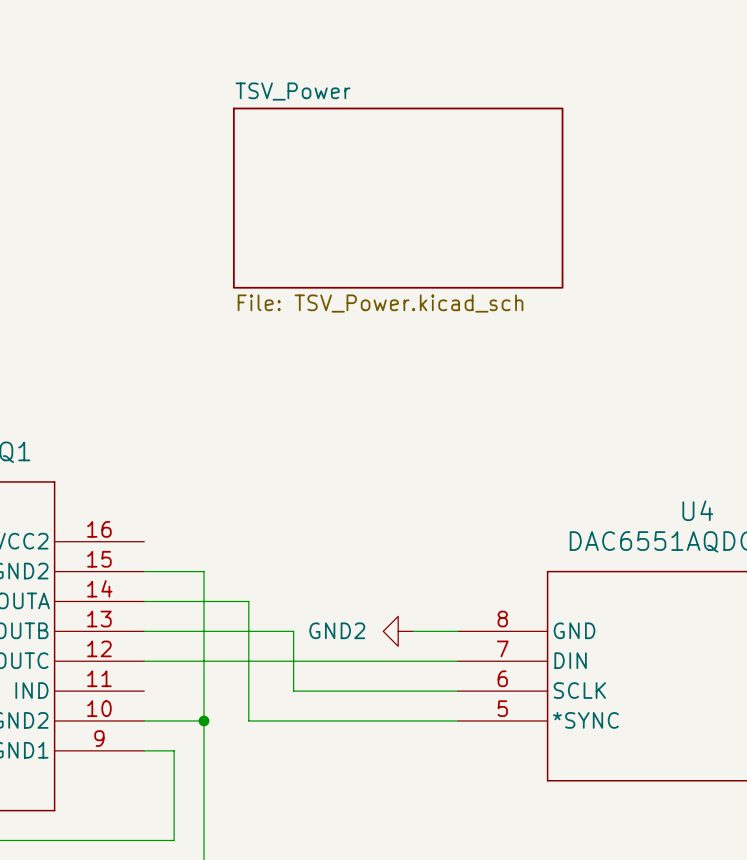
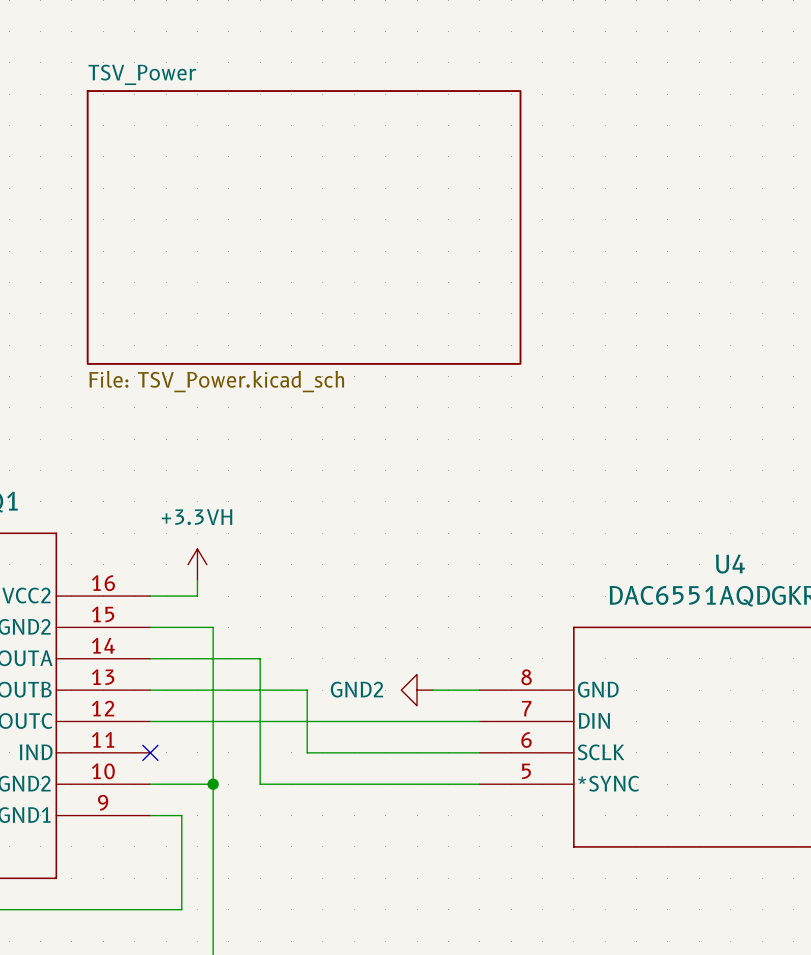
sheet TSV_Power: none -> File: TSV_Power.kicad_sch (304, 227)
sheet TSV_Power: File: TSV_Power.kicad_sch (398, 198) -> none
power symbol: none -> +3.3VH (197, 564)
wire: none -> (197, 580) (197, 596) (150, 596)
no-connect mark: none -> (150, 752)

